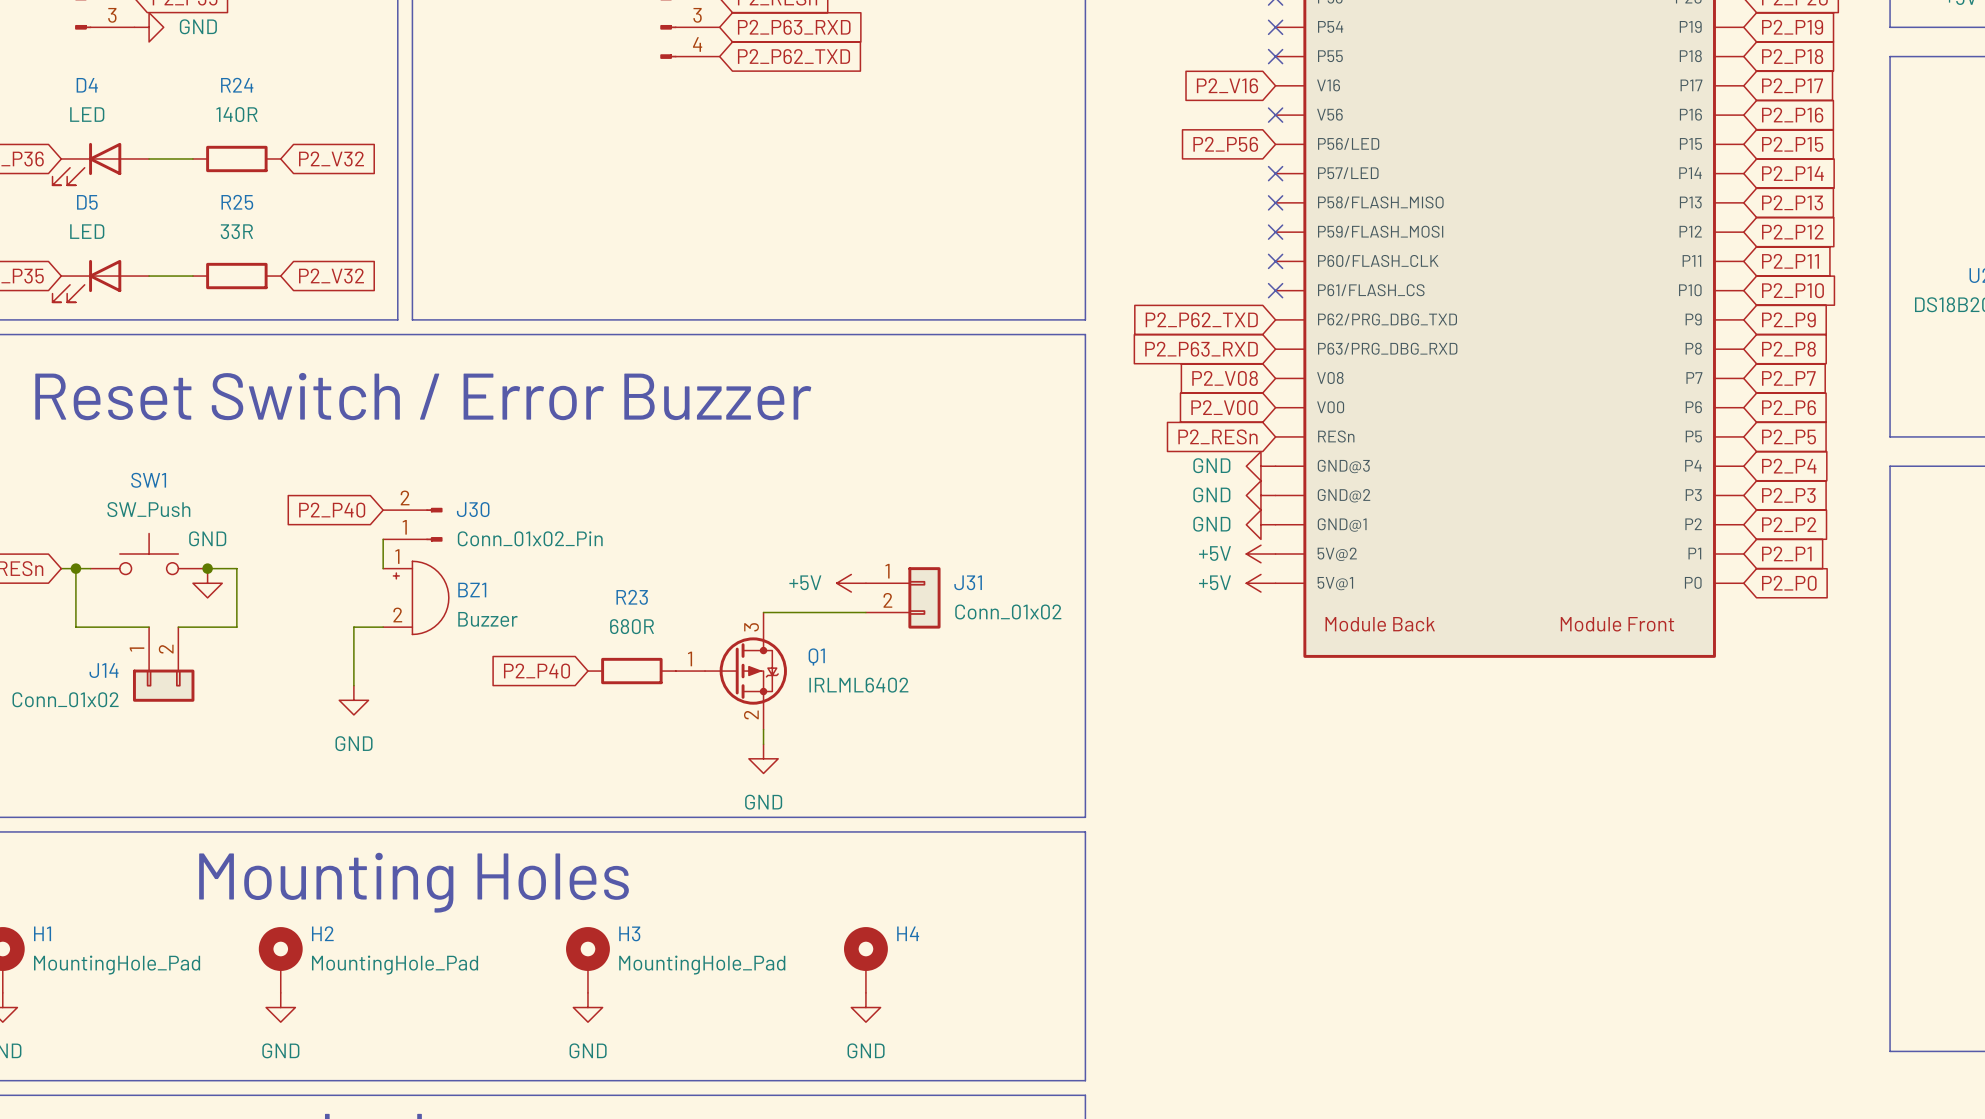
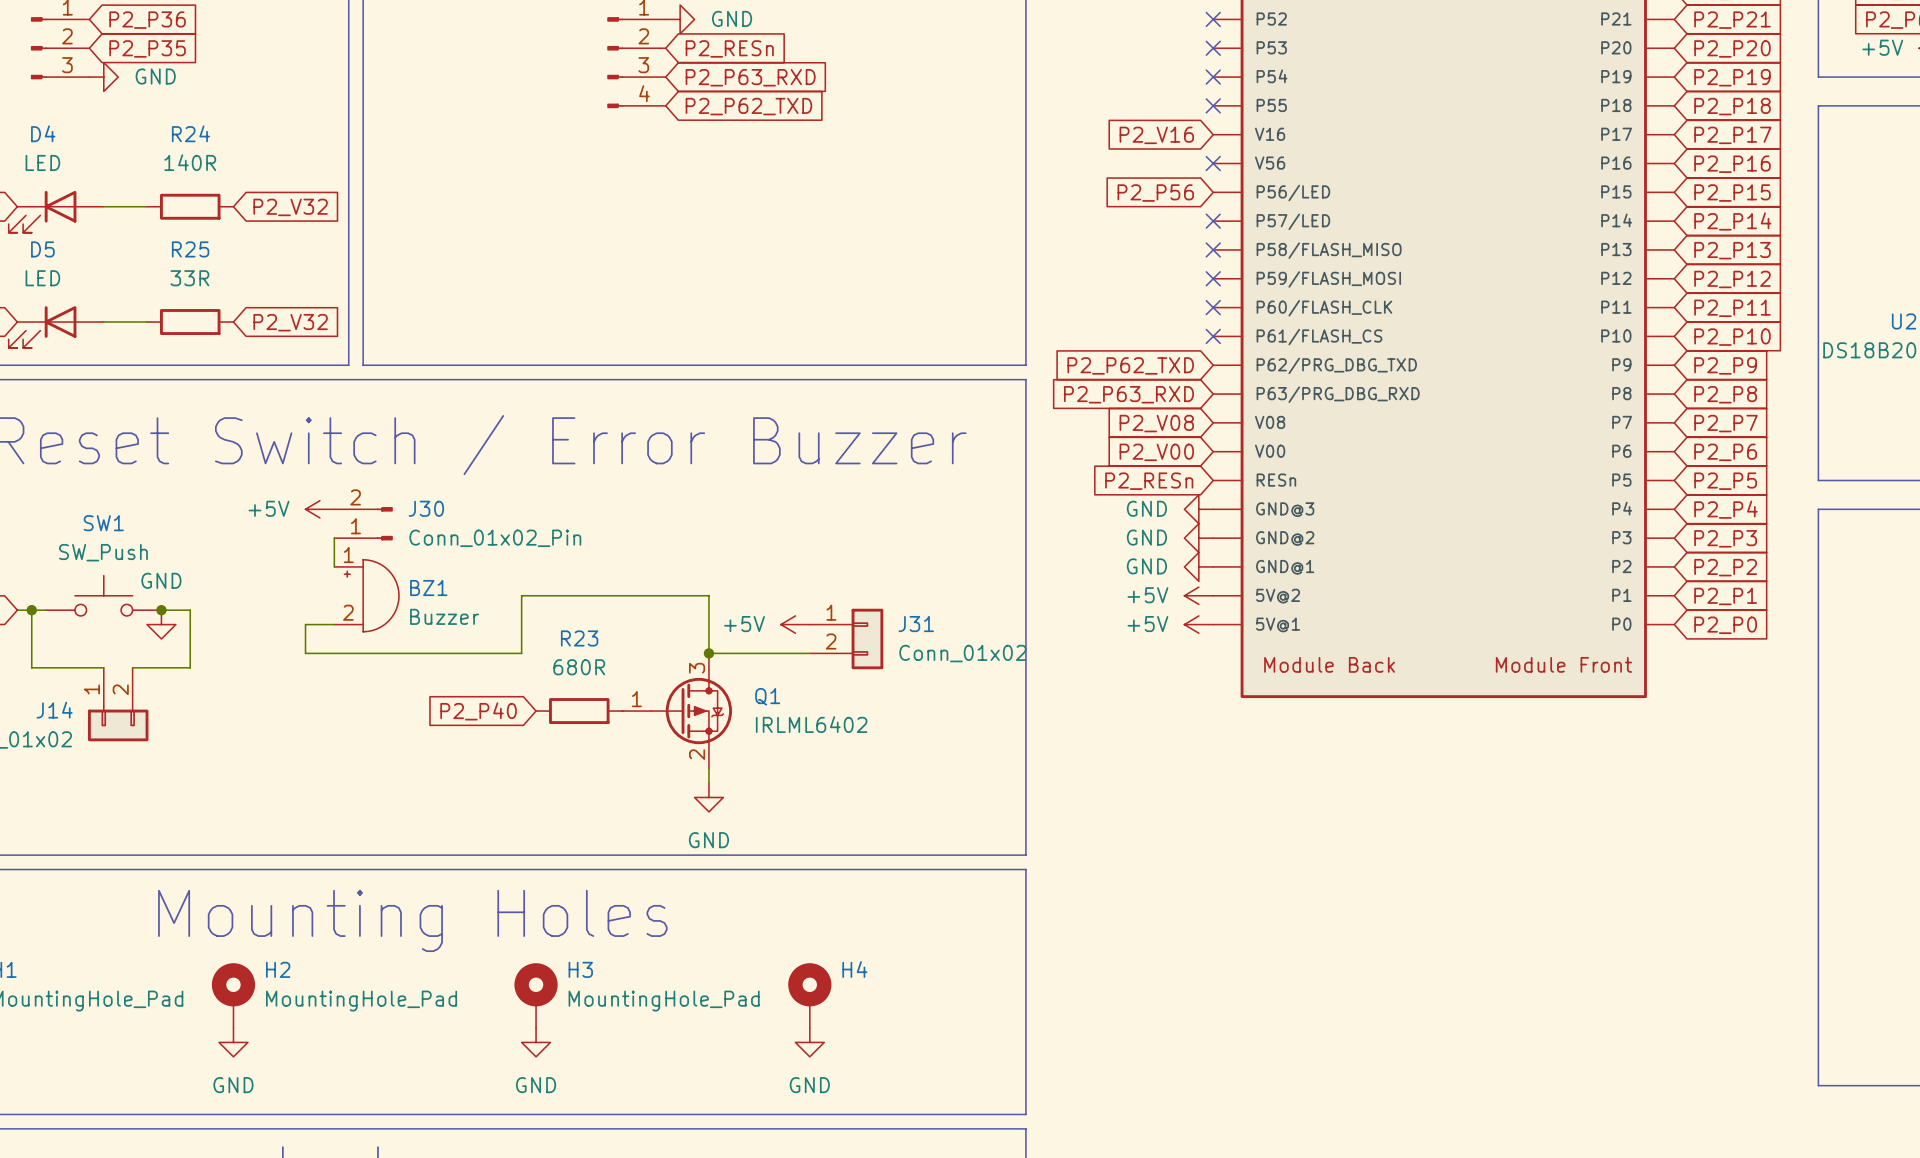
power symbol: none -> +5V (319, 509)
global label: P2_P40 (332, 510) -> none
J30 position: (412, 524) -> (363, 523)
wire: (383, 539) (383, 568) -> (334, 538) (334, 566)
wire: none -> (334, 624) (305, 624) (305, 653) (521, 653) (521, 595) (708, 595) (708, 653)
BZ1 position: (416, 597) -> (366, 595)
junction: none -> (708, 653)
wire: (383, 627) (353, 627) (353, 685) -> none
power symbol: GND (353, 700) -> none

